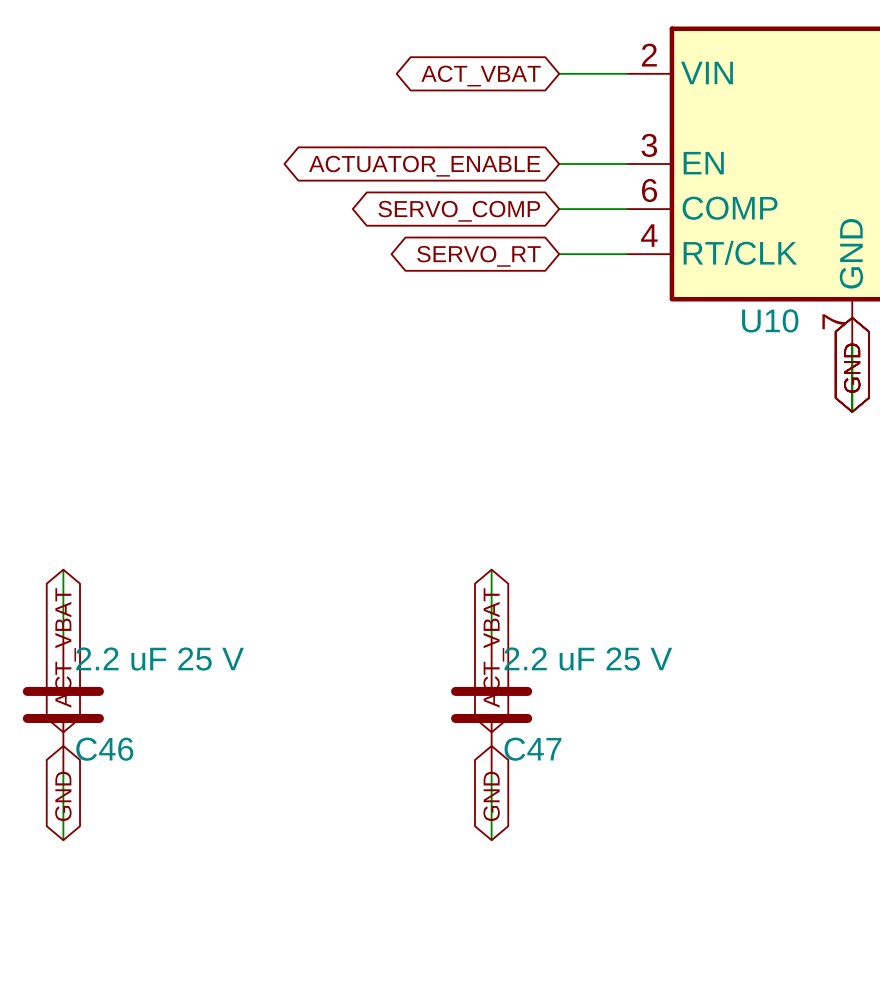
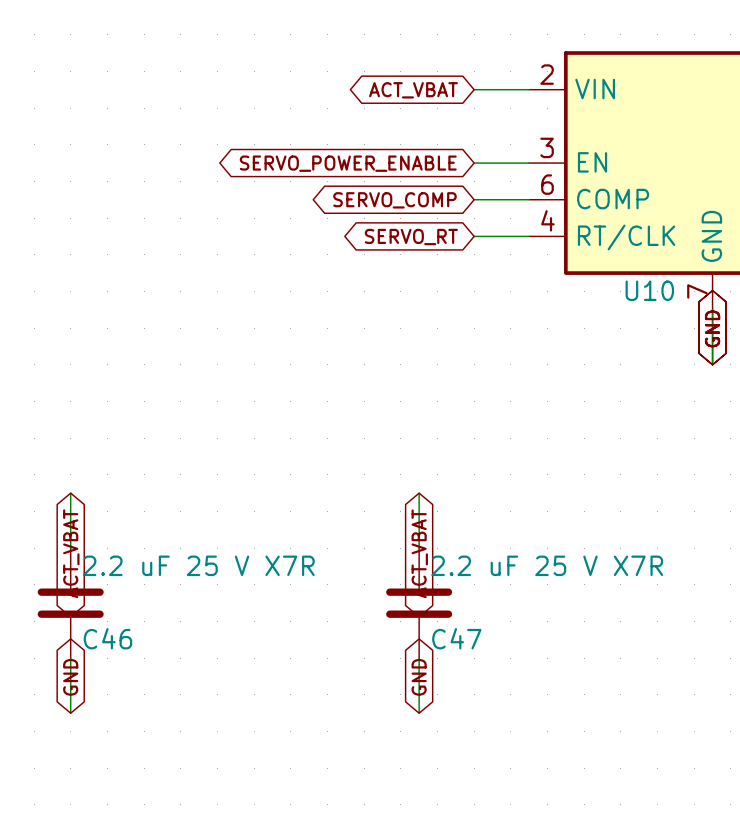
global label: ACTUATOR_ENABLE (424, 166) -> SERVO_POWER_ENABLE (348, 163)
C46 value: 2.2 uF 25 V (160, 659) -> 2.2 uF 25 V X7R (198, 565)
C47 value: 2.2 uF 25 V (588, 659) -> 2.2 uF 25 V X7R (547, 565)

